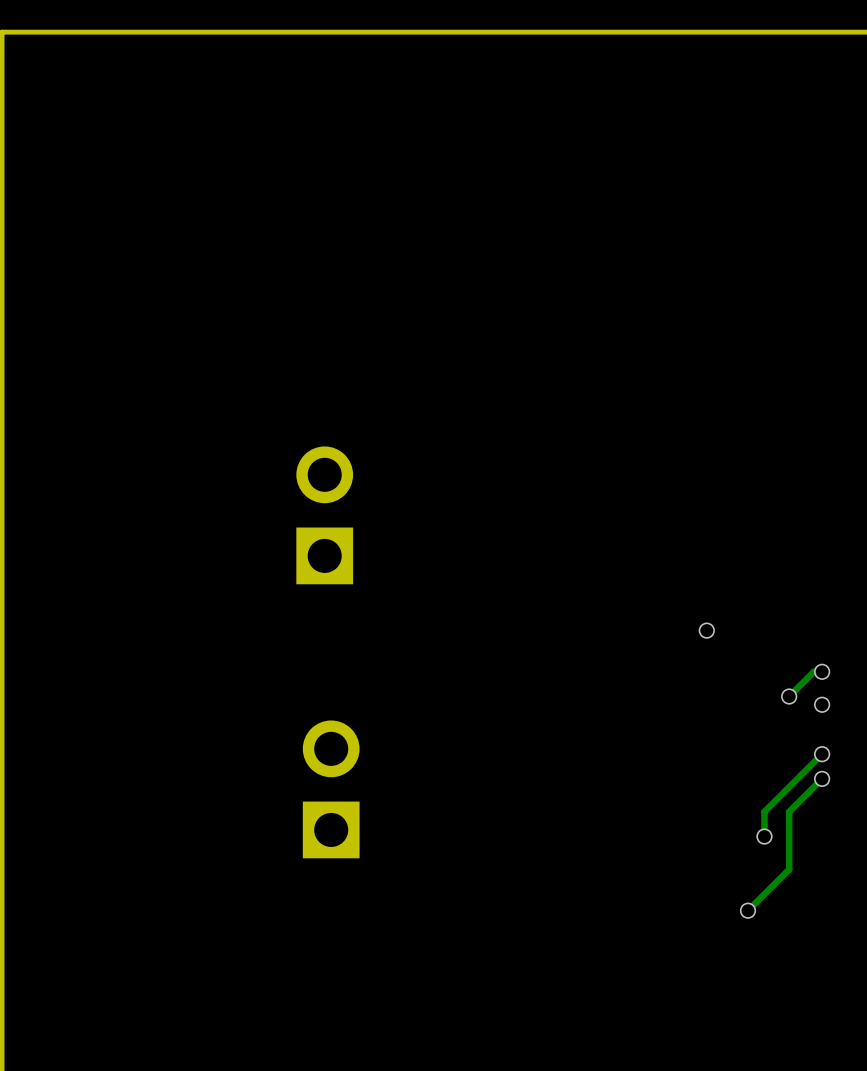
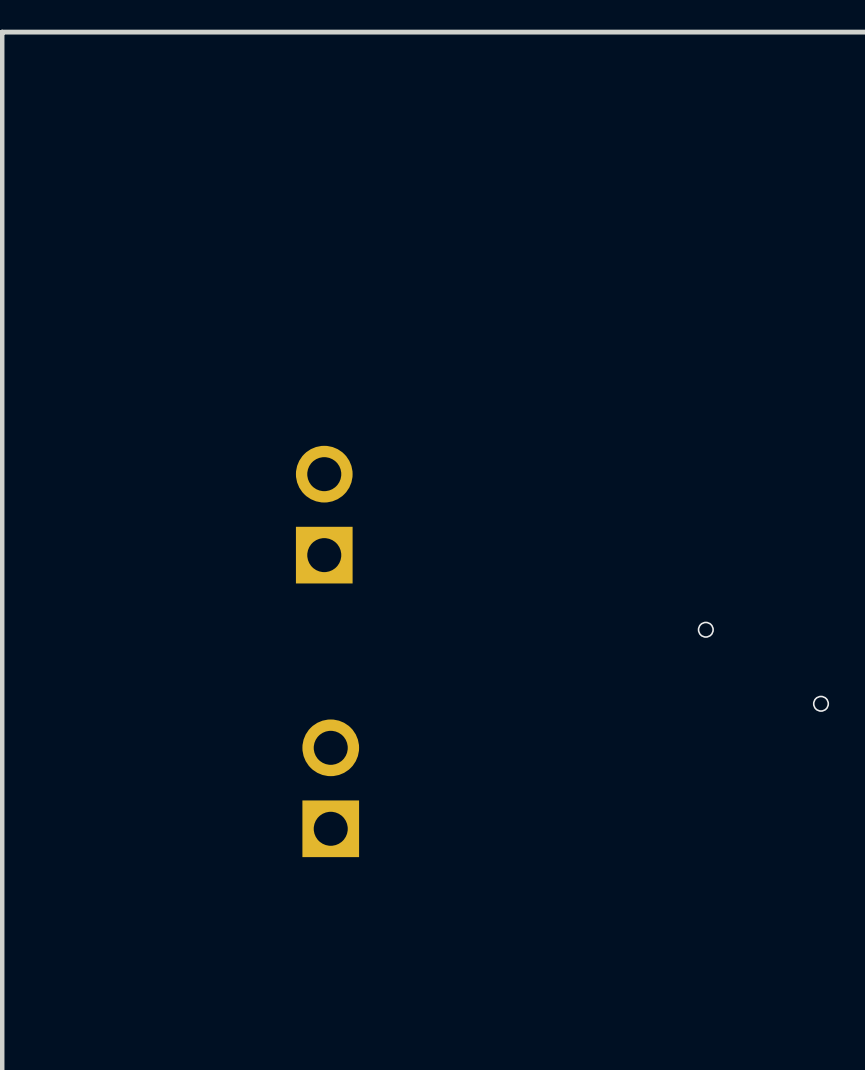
track: (822, 671) (813, 671) (789, 696) -> none
via: (822, 671) -> none
via: (789, 696) -> none
track: (822, 754) (764, 811) (764, 836) -> none
via: (822, 754) -> none
track: (822, 778) (789, 811) (789, 869) (748, 910) -> none
via: (822, 778) -> none
via: (764, 836) -> none
via: (748, 910) -> none

